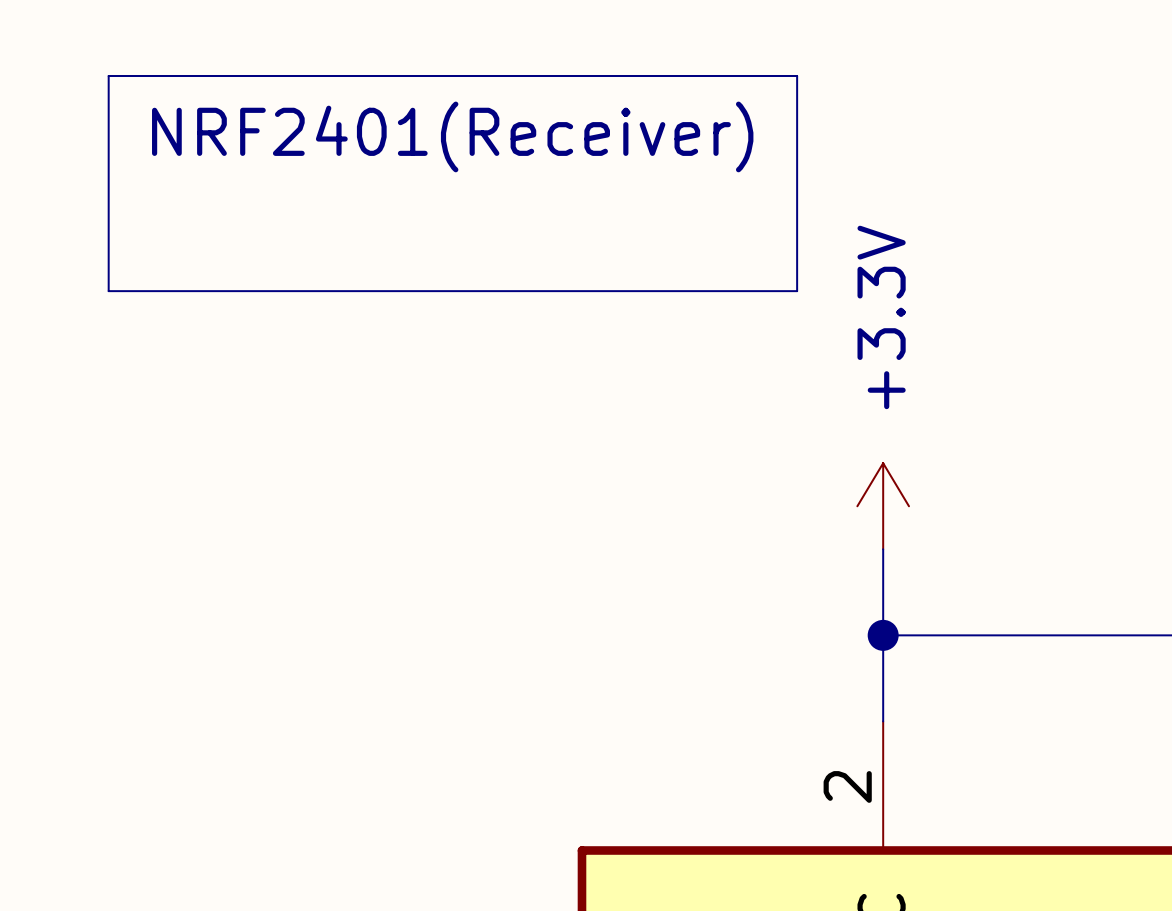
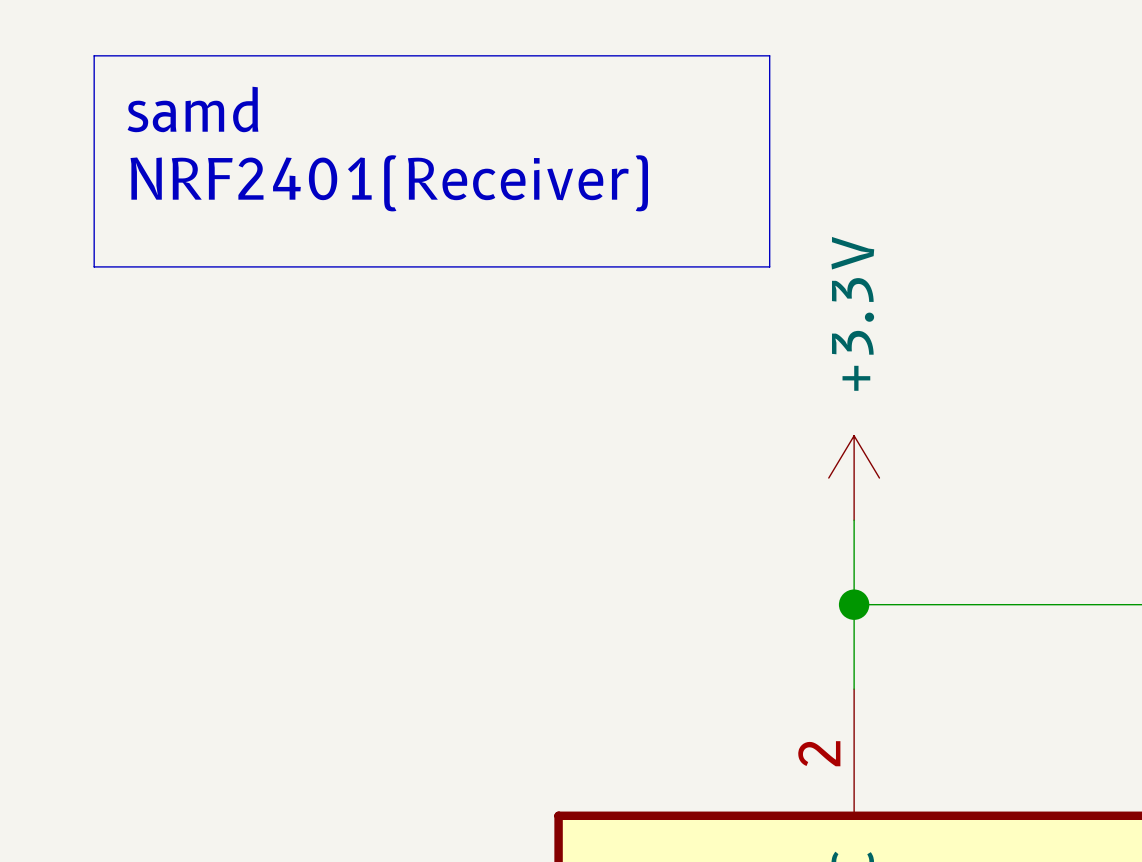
text: NRF2401(Receiver) (452, 136) -> samd (192, 109)
text: none -> NRF2401(Receiver) (389, 183)

